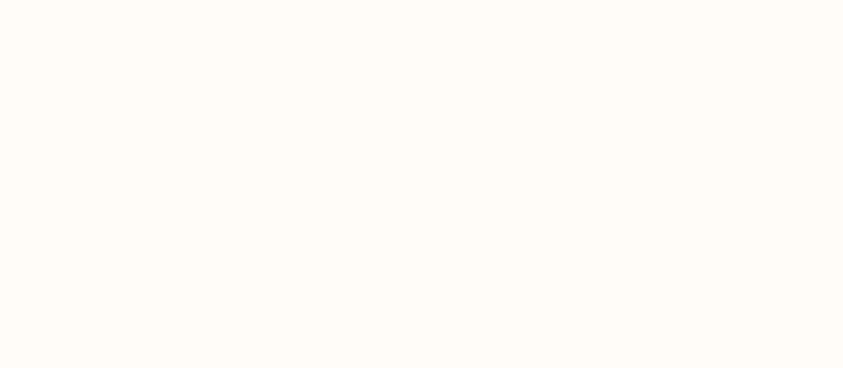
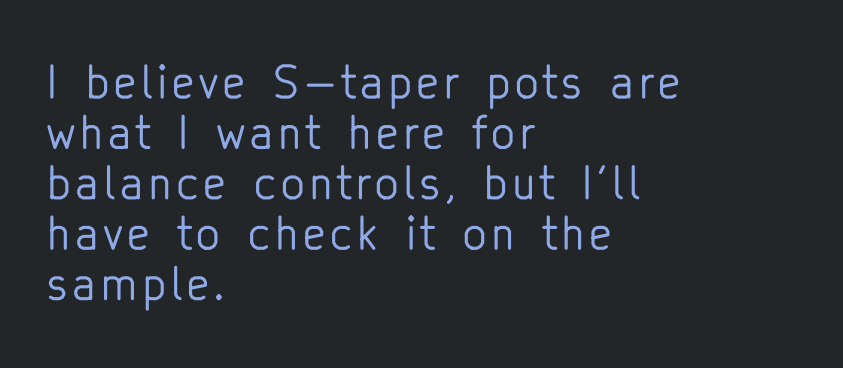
text: none -> I believe S-taper pots are (364, 86)
text: none -> what I want here for (291, 131)
text: none -> balance controls, but I'll (344, 184)
text: none -> have to check it on the (329, 232)
text: none -> sample. (135, 288)

